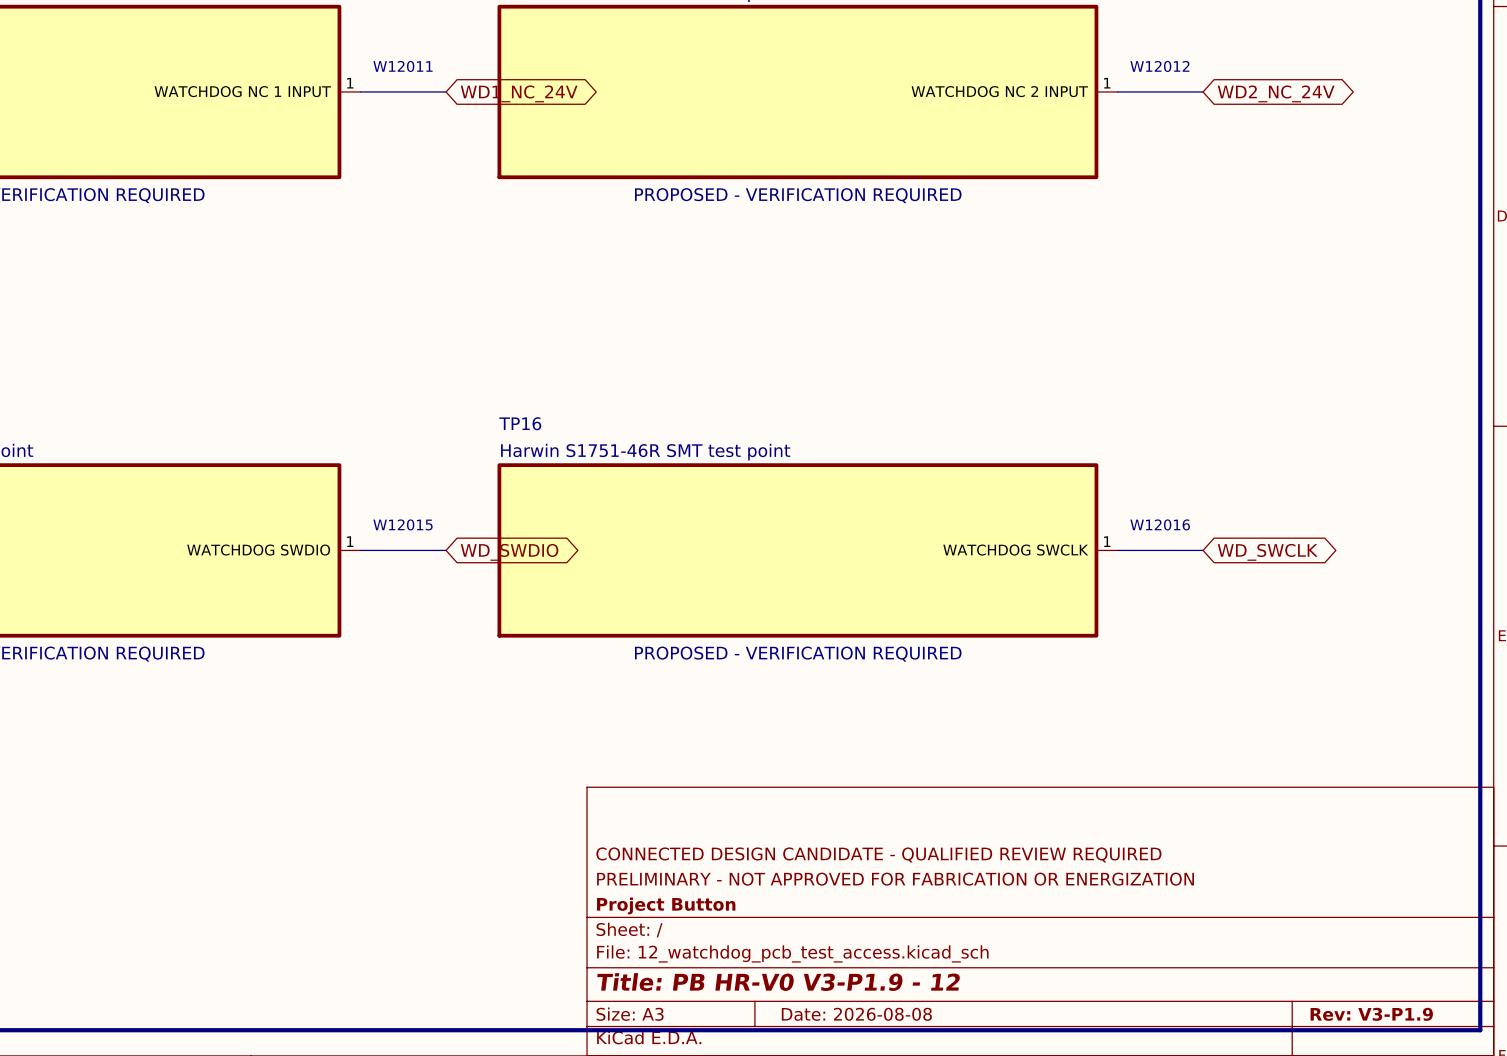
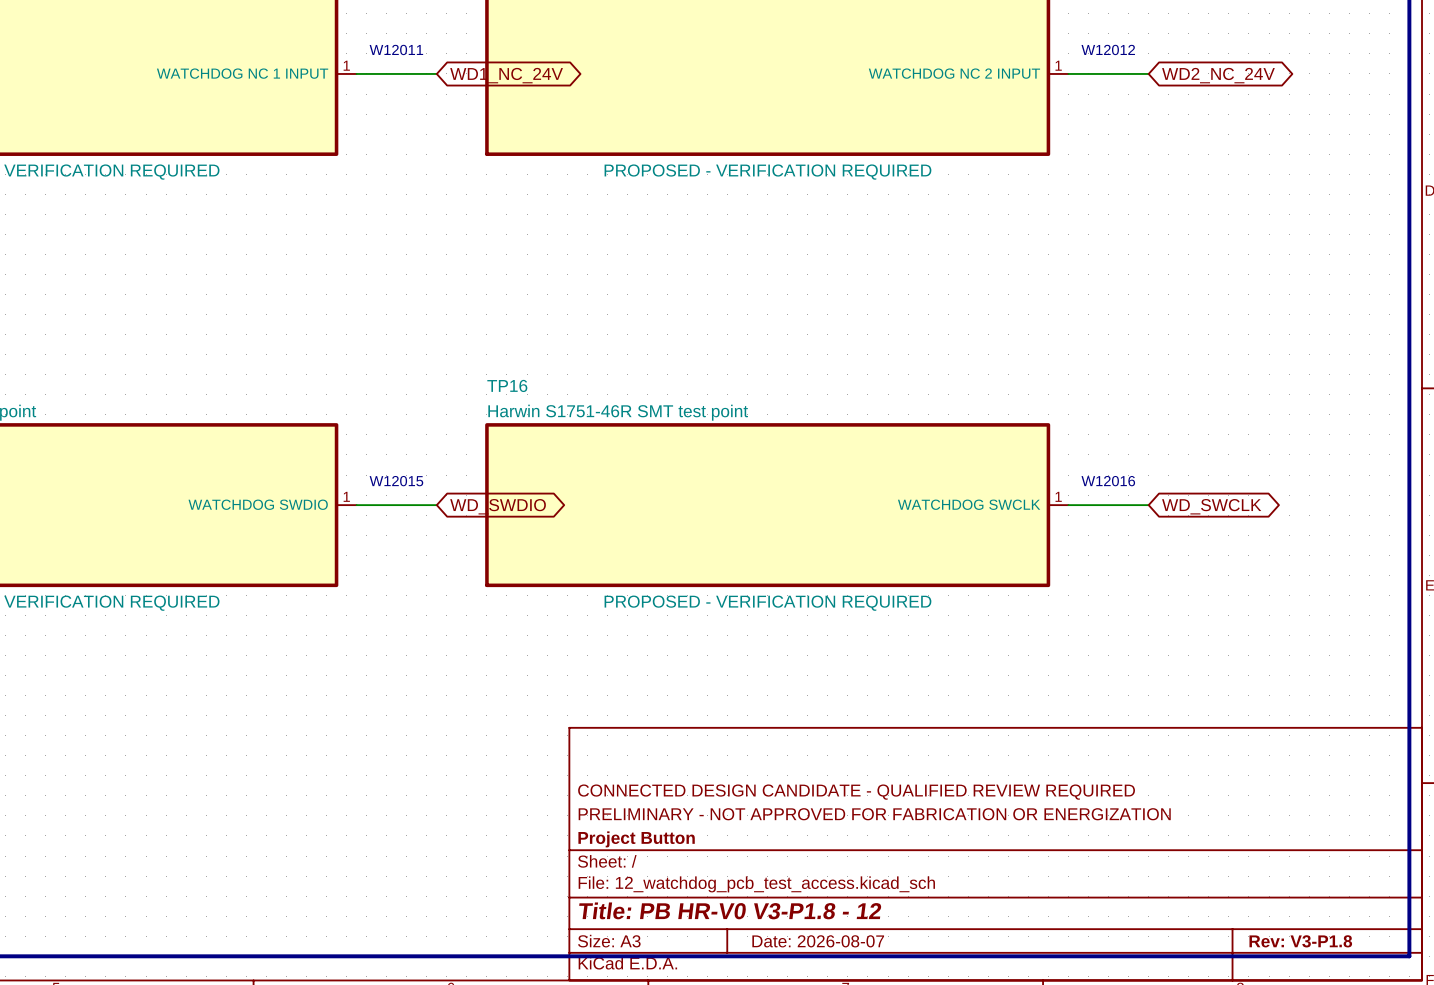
title block: Title: PB HR-V0 V3-P1.9 - 12 (778, 982) -> Title: PB HR-V0 V3-P1.8 - 12 (730, 910)
title block: Date: 2026-08-08 (856, 1014) -> Date: 2026-08-07 (818, 941)
title block: Rev: V3-P1.9 (1371, 1014) -> Rev: V3-P1.8 (1300, 941)

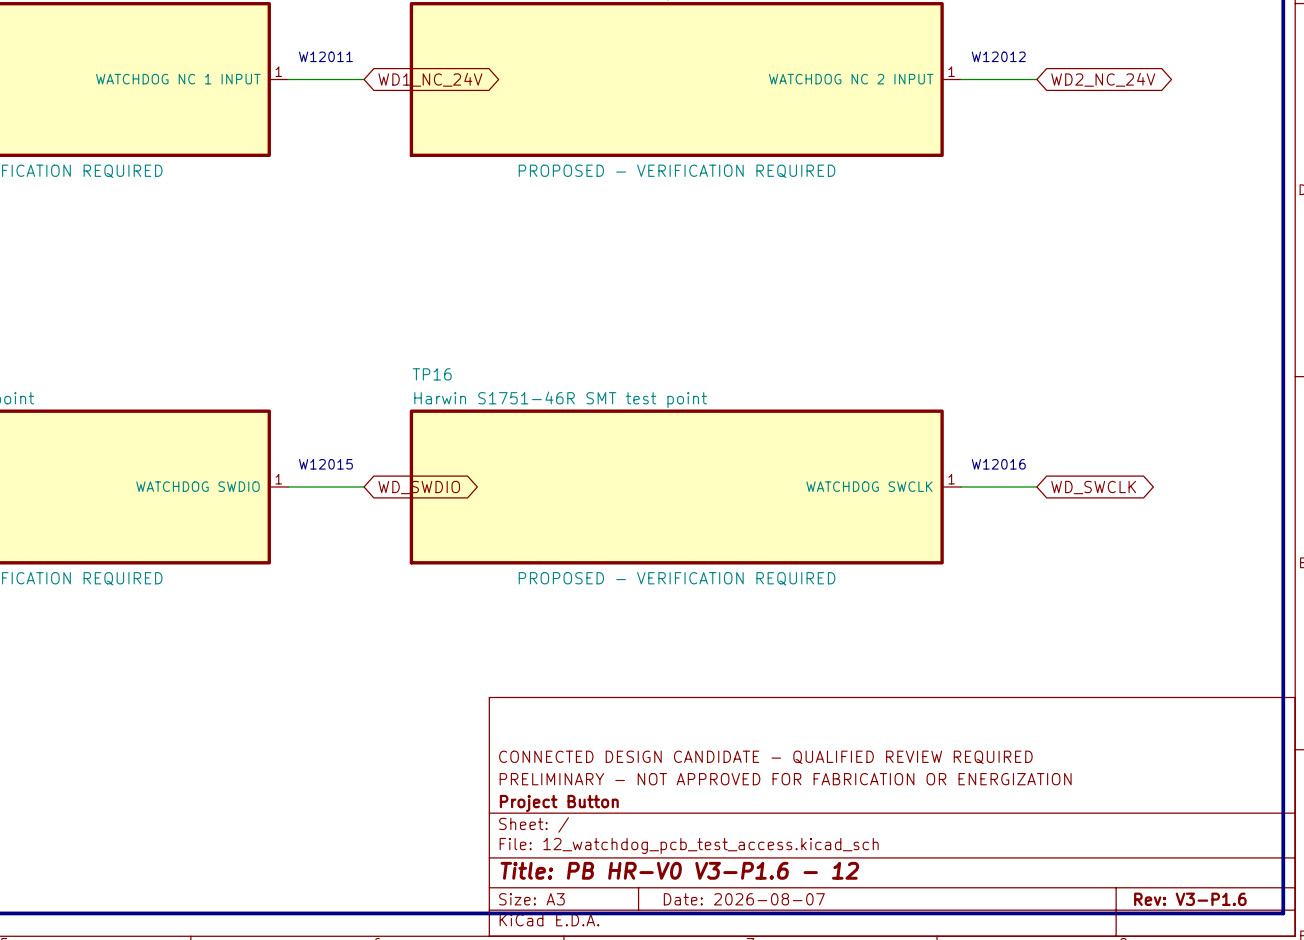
title block: Title: PB HR-V0 V3-P1.8 - 12 (730, 910) -> Title: PB HR-V0 V3-P1.6 - 12 (679, 870)
title block: Rev: V3-P1.8 (1300, 941) -> Rev: V3-P1.6 (1190, 899)

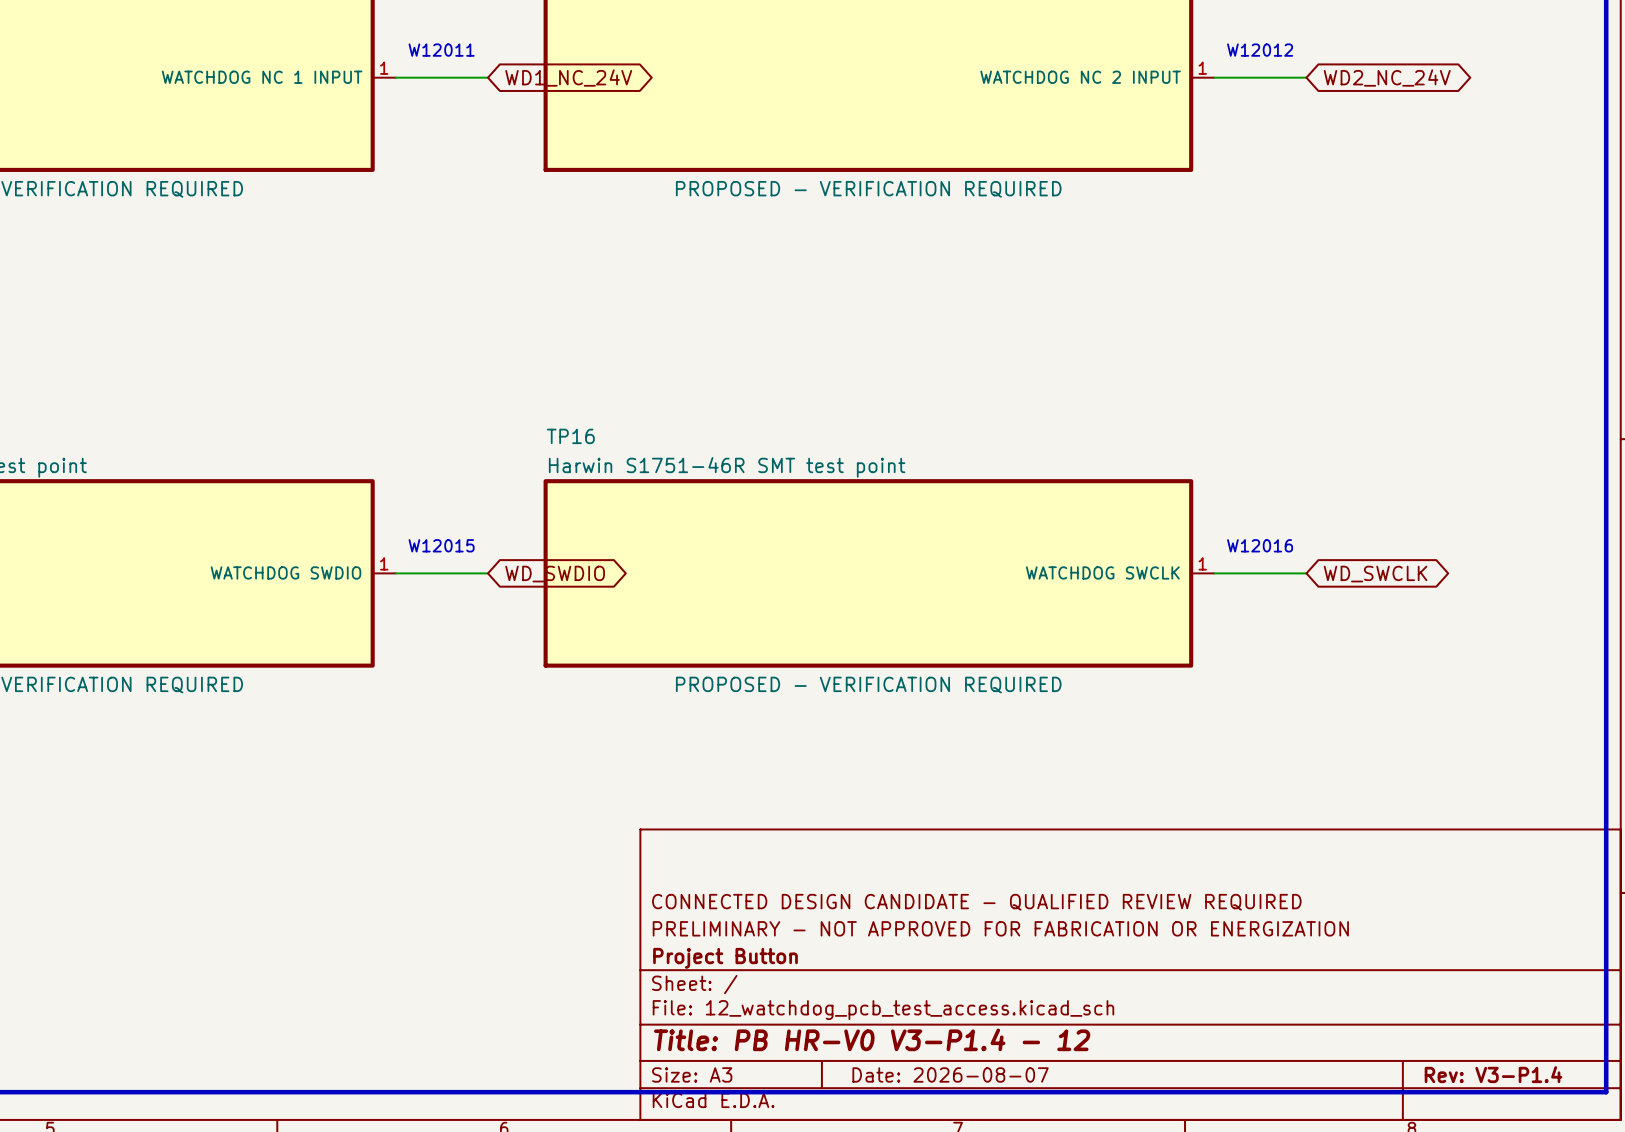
title block: Title: PB HR-V0 V3-P1.6 - 12 (679, 870) -> Title: PB HR-V0 V3-P1.4 - 12 (872, 1039)
title block: Rev: V3-P1.6 (1190, 899) -> Rev: V3-P1.4 (1493, 1074)

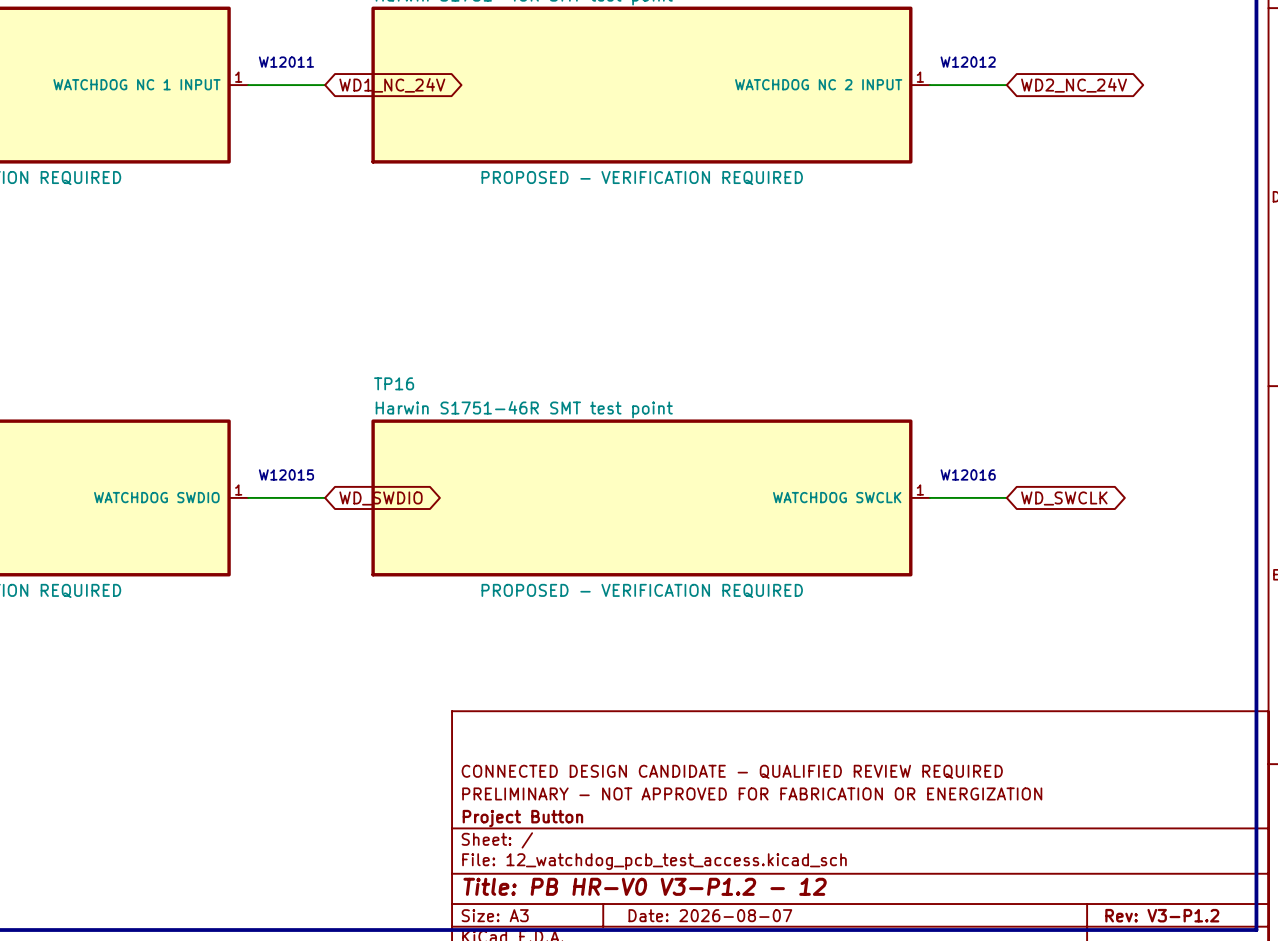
title block: Title: PB HR-V0 V3-P1.4 - 12 (872, 1039) -> Title: PB HR-V0 V3-P1.2 - 12 (645, 886)
title block: Rev: V3-P1.4 (1493, 1074) -> Rev: V3-P1.2 (1162, 915)

